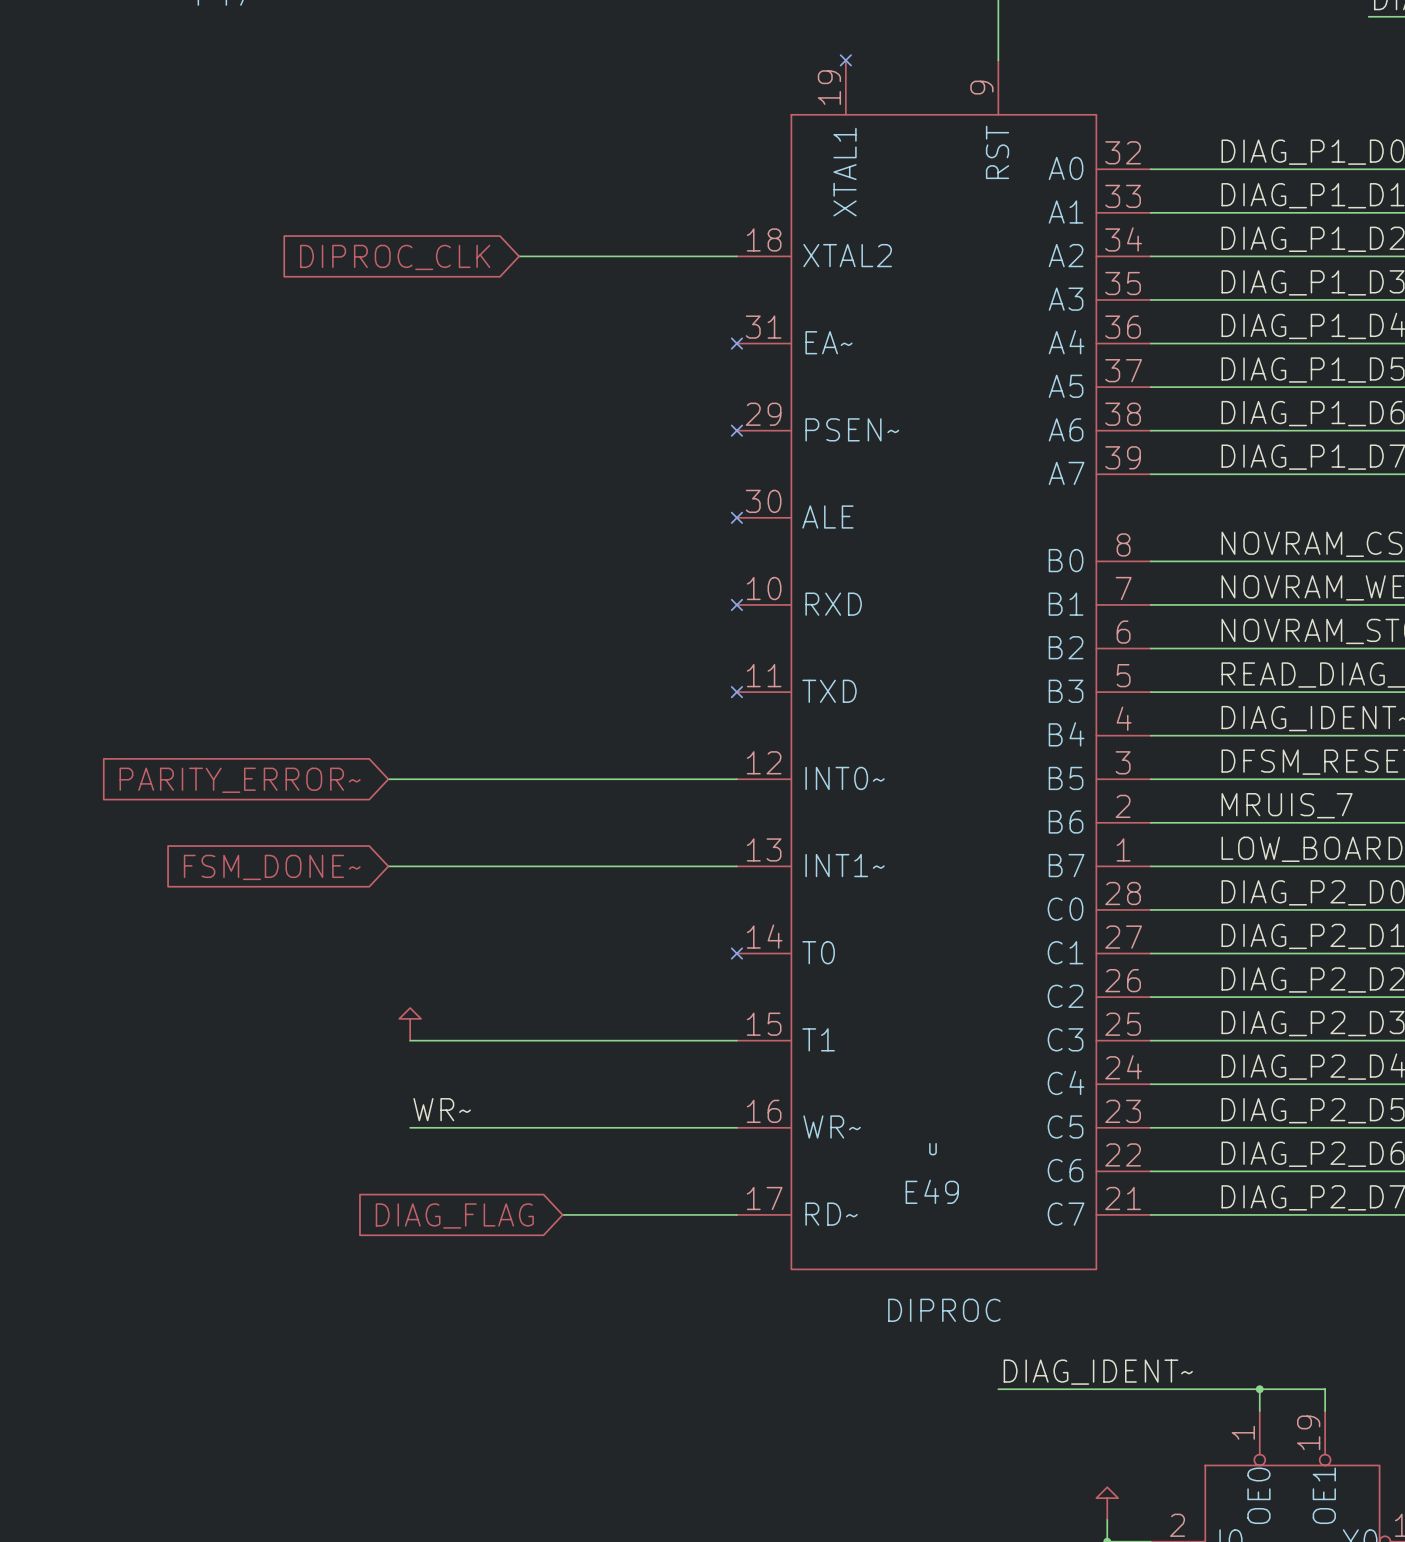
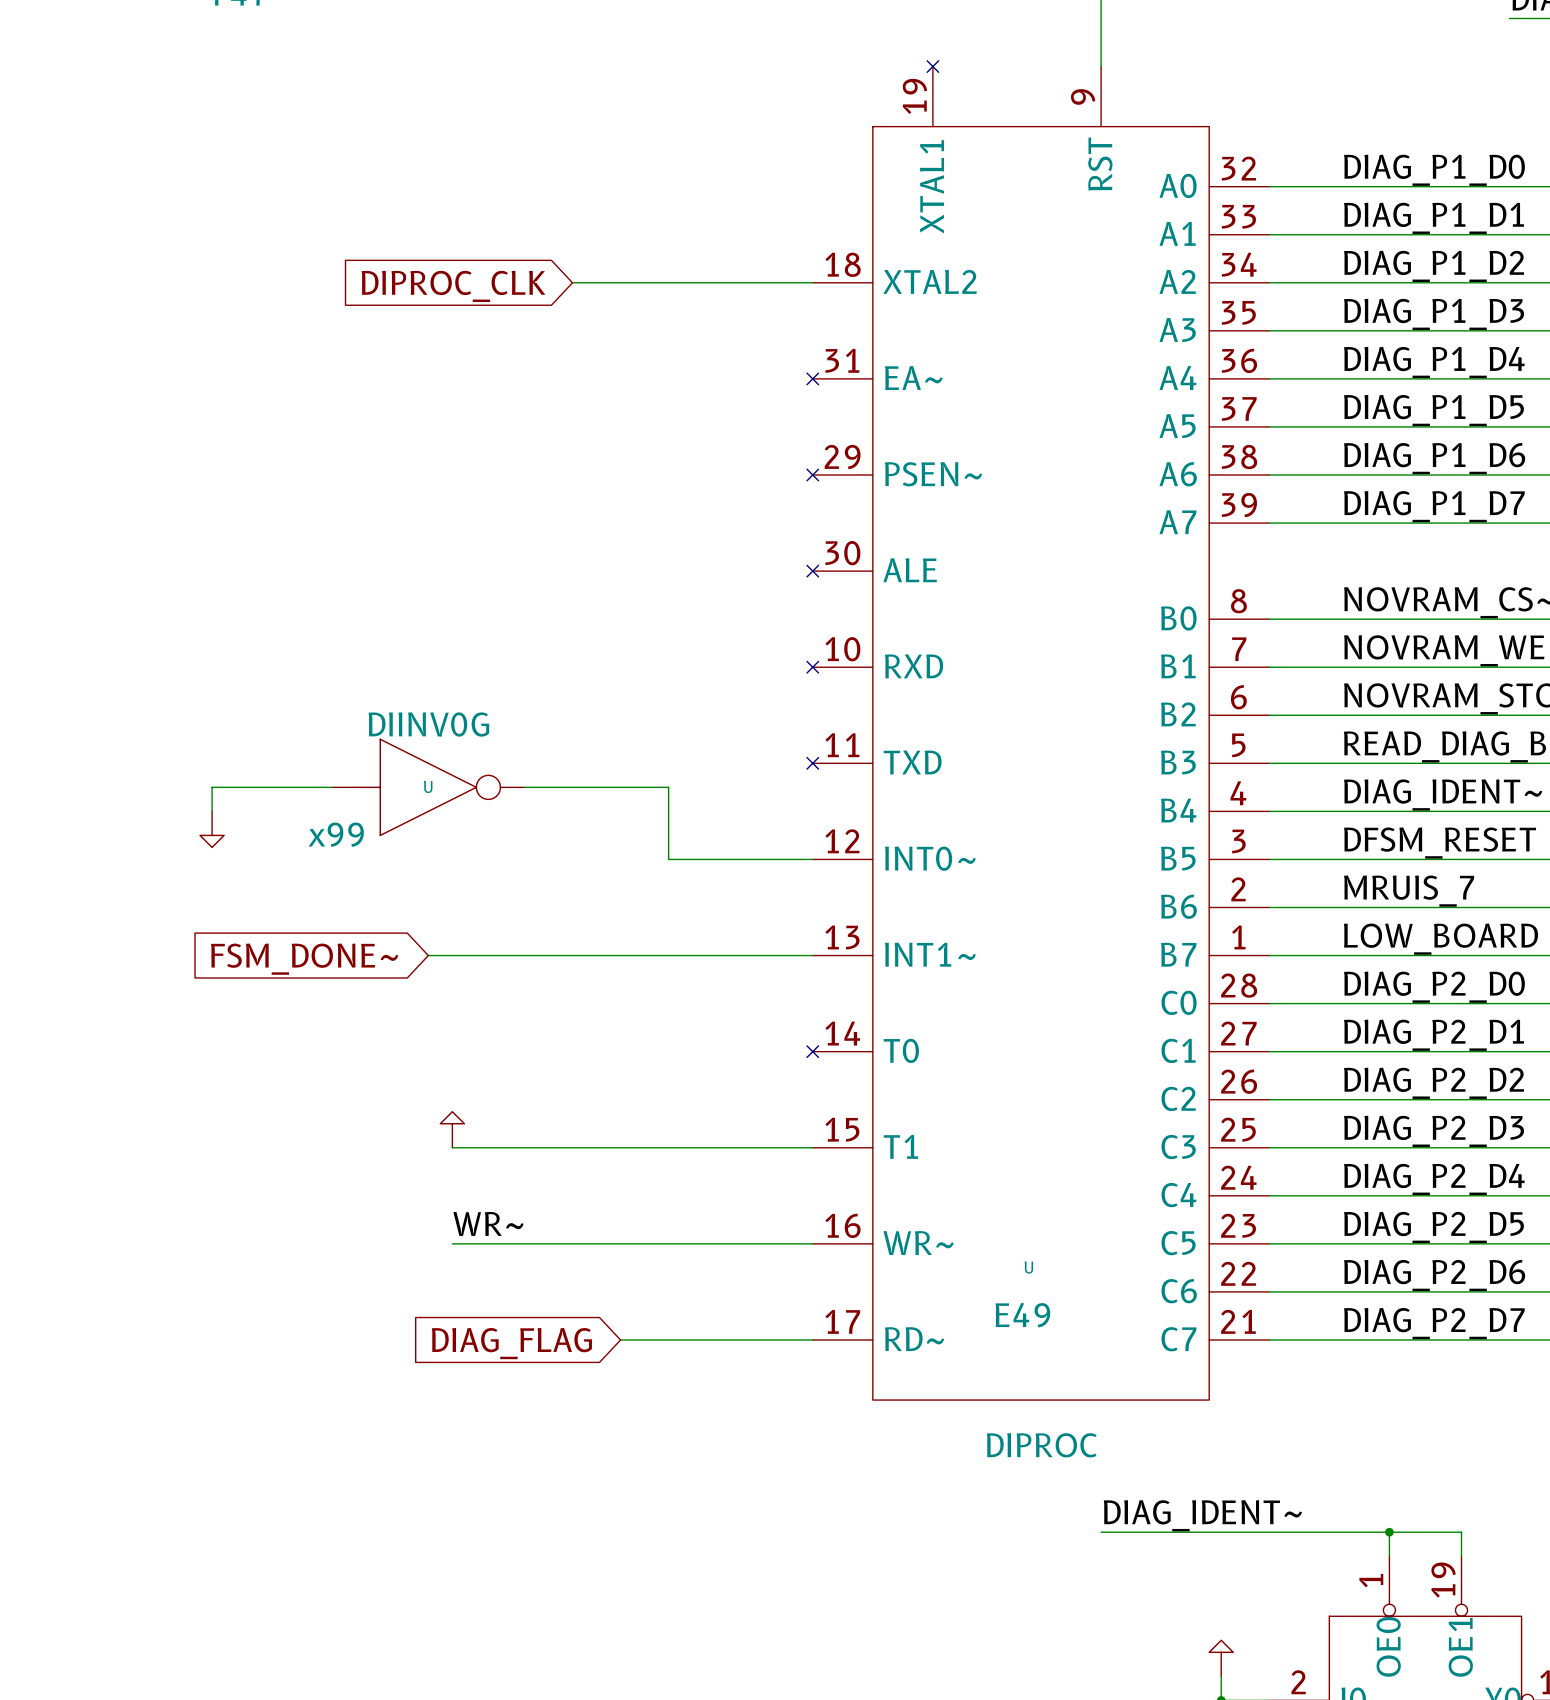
wire: none -> (332, 787) (212, 787) (212, 811)
U: none -> (428, 787)
power symbol: none -> (212, 829)
wire: (388, 779) (606, 779) -> (524, 787) (668, 787) (668, 859)
global label: PARITY_ERROR~ (240, 780) -> none

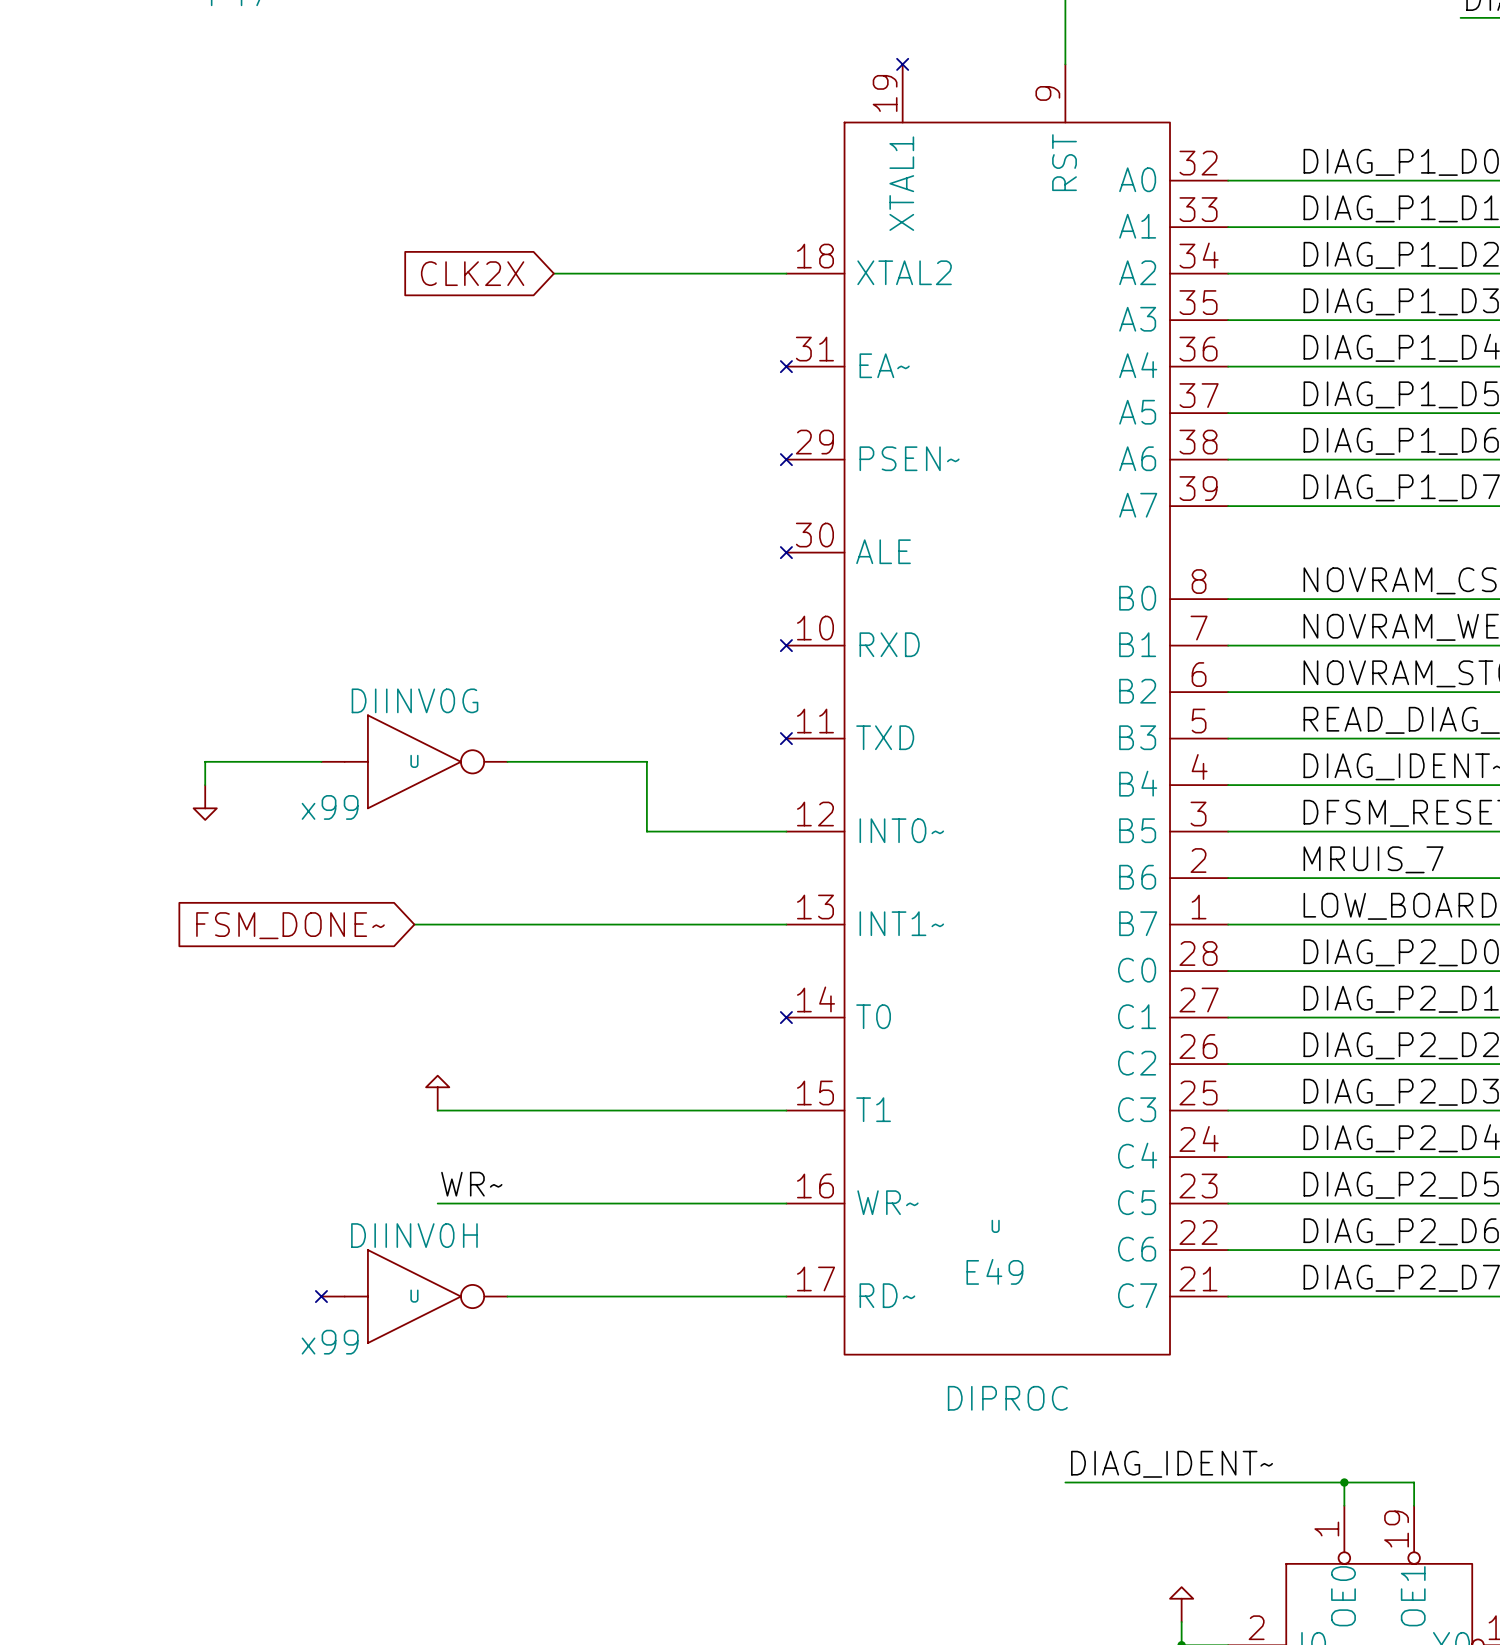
global label: DIPROC_CLK (453, 286) -> CLK2X (472, 273)
no-connect mark: none -> (321, 1296)
U: none -> (414, 1296)
wire: none -> (507, 1296) (600, 1296)
global label: DIAG_FLAG (511, 1343) -> none

